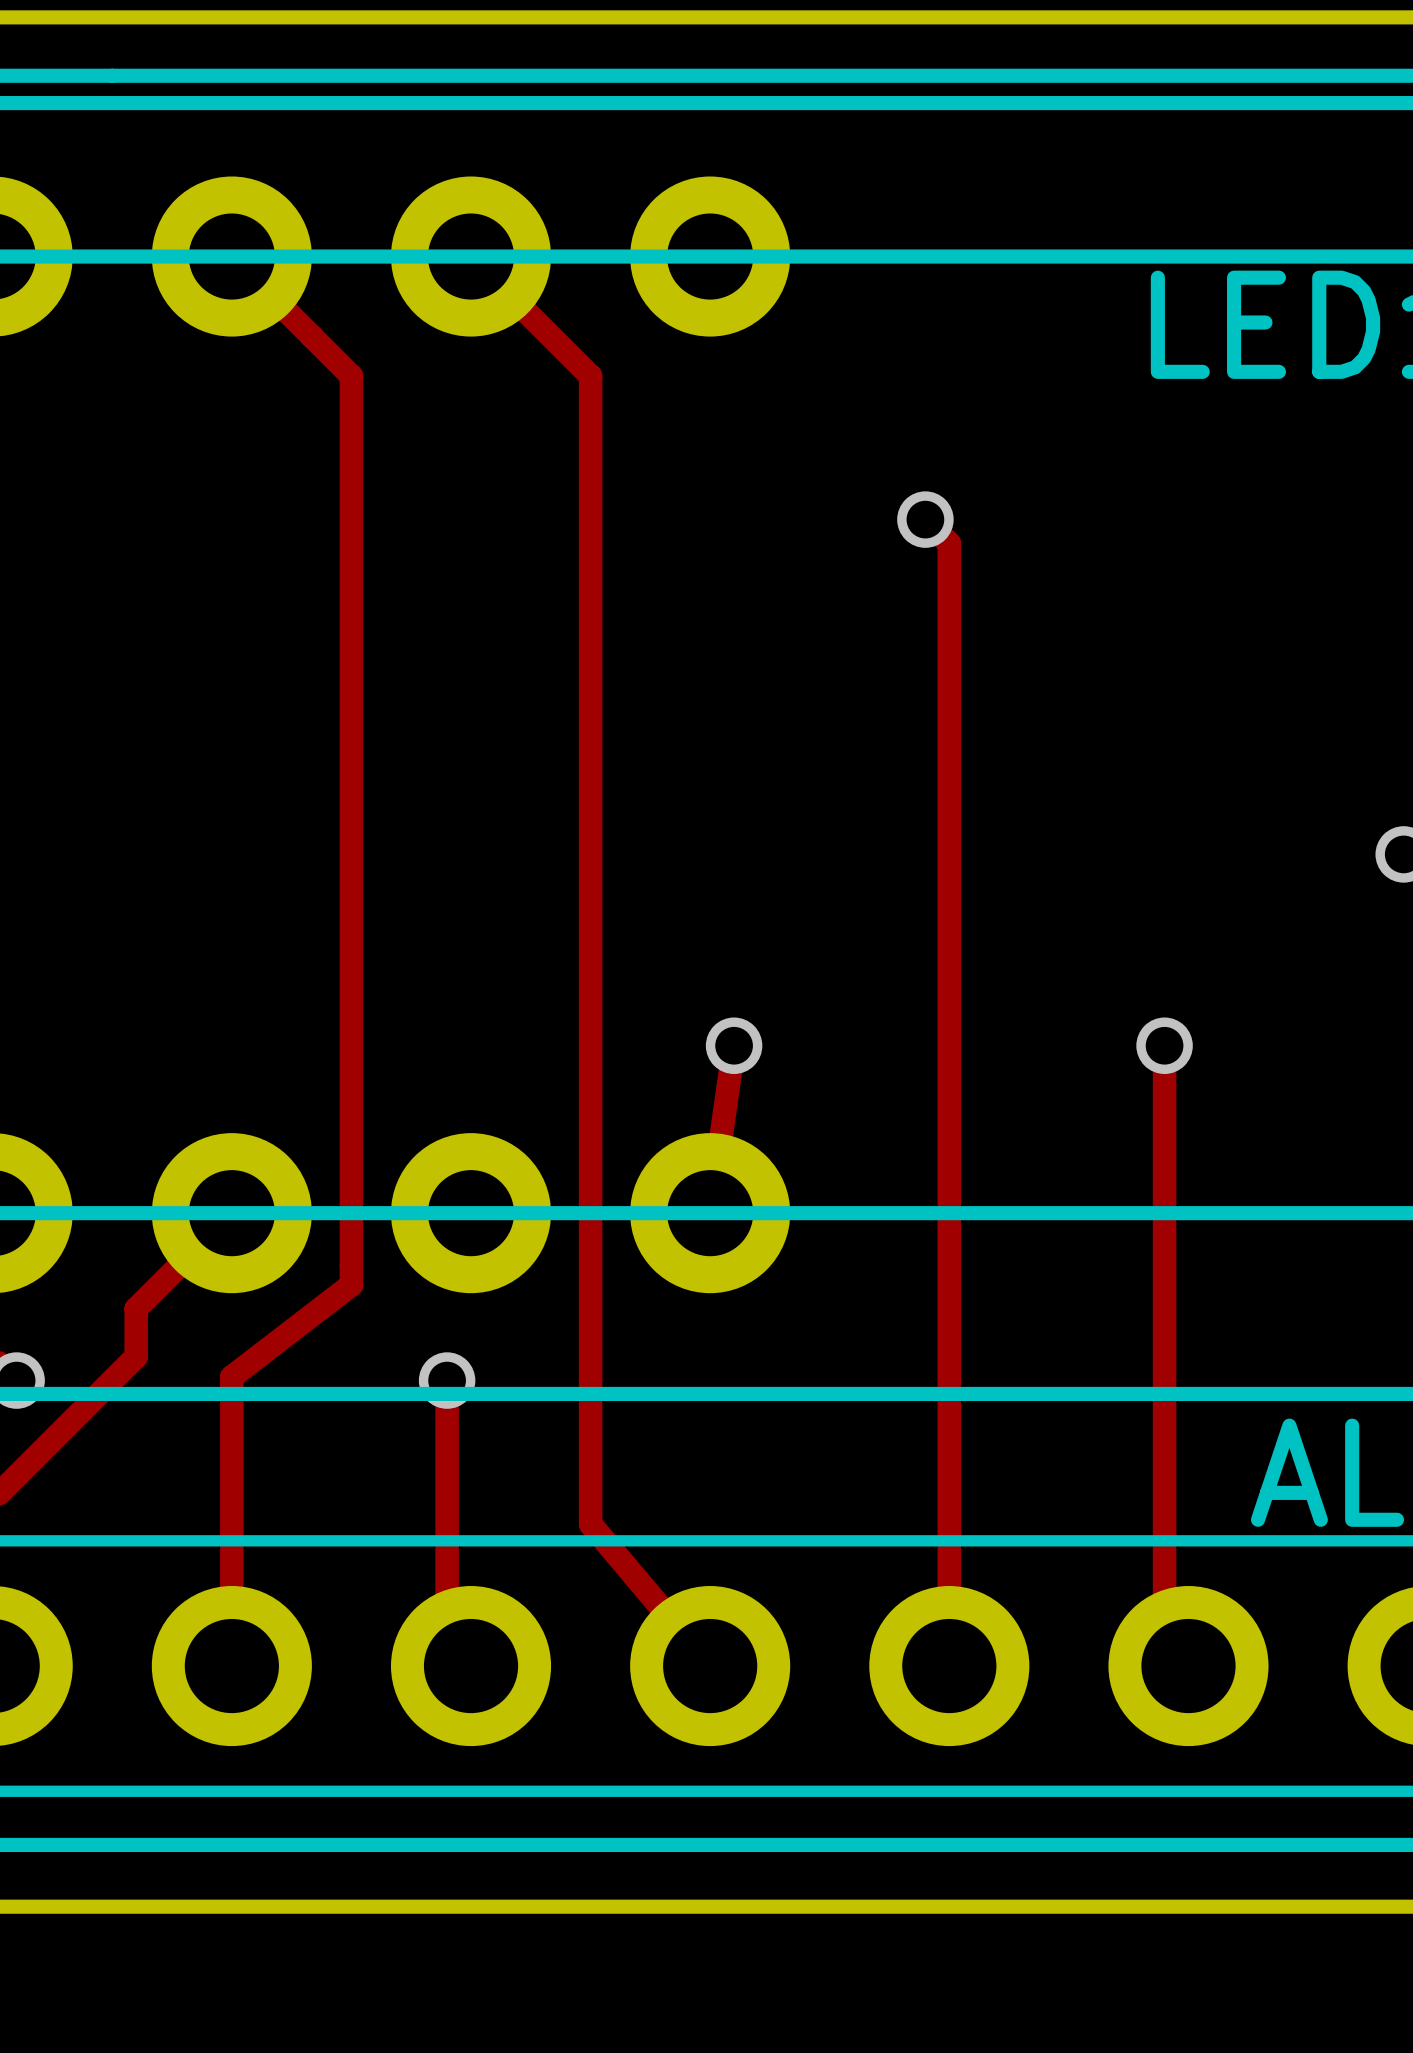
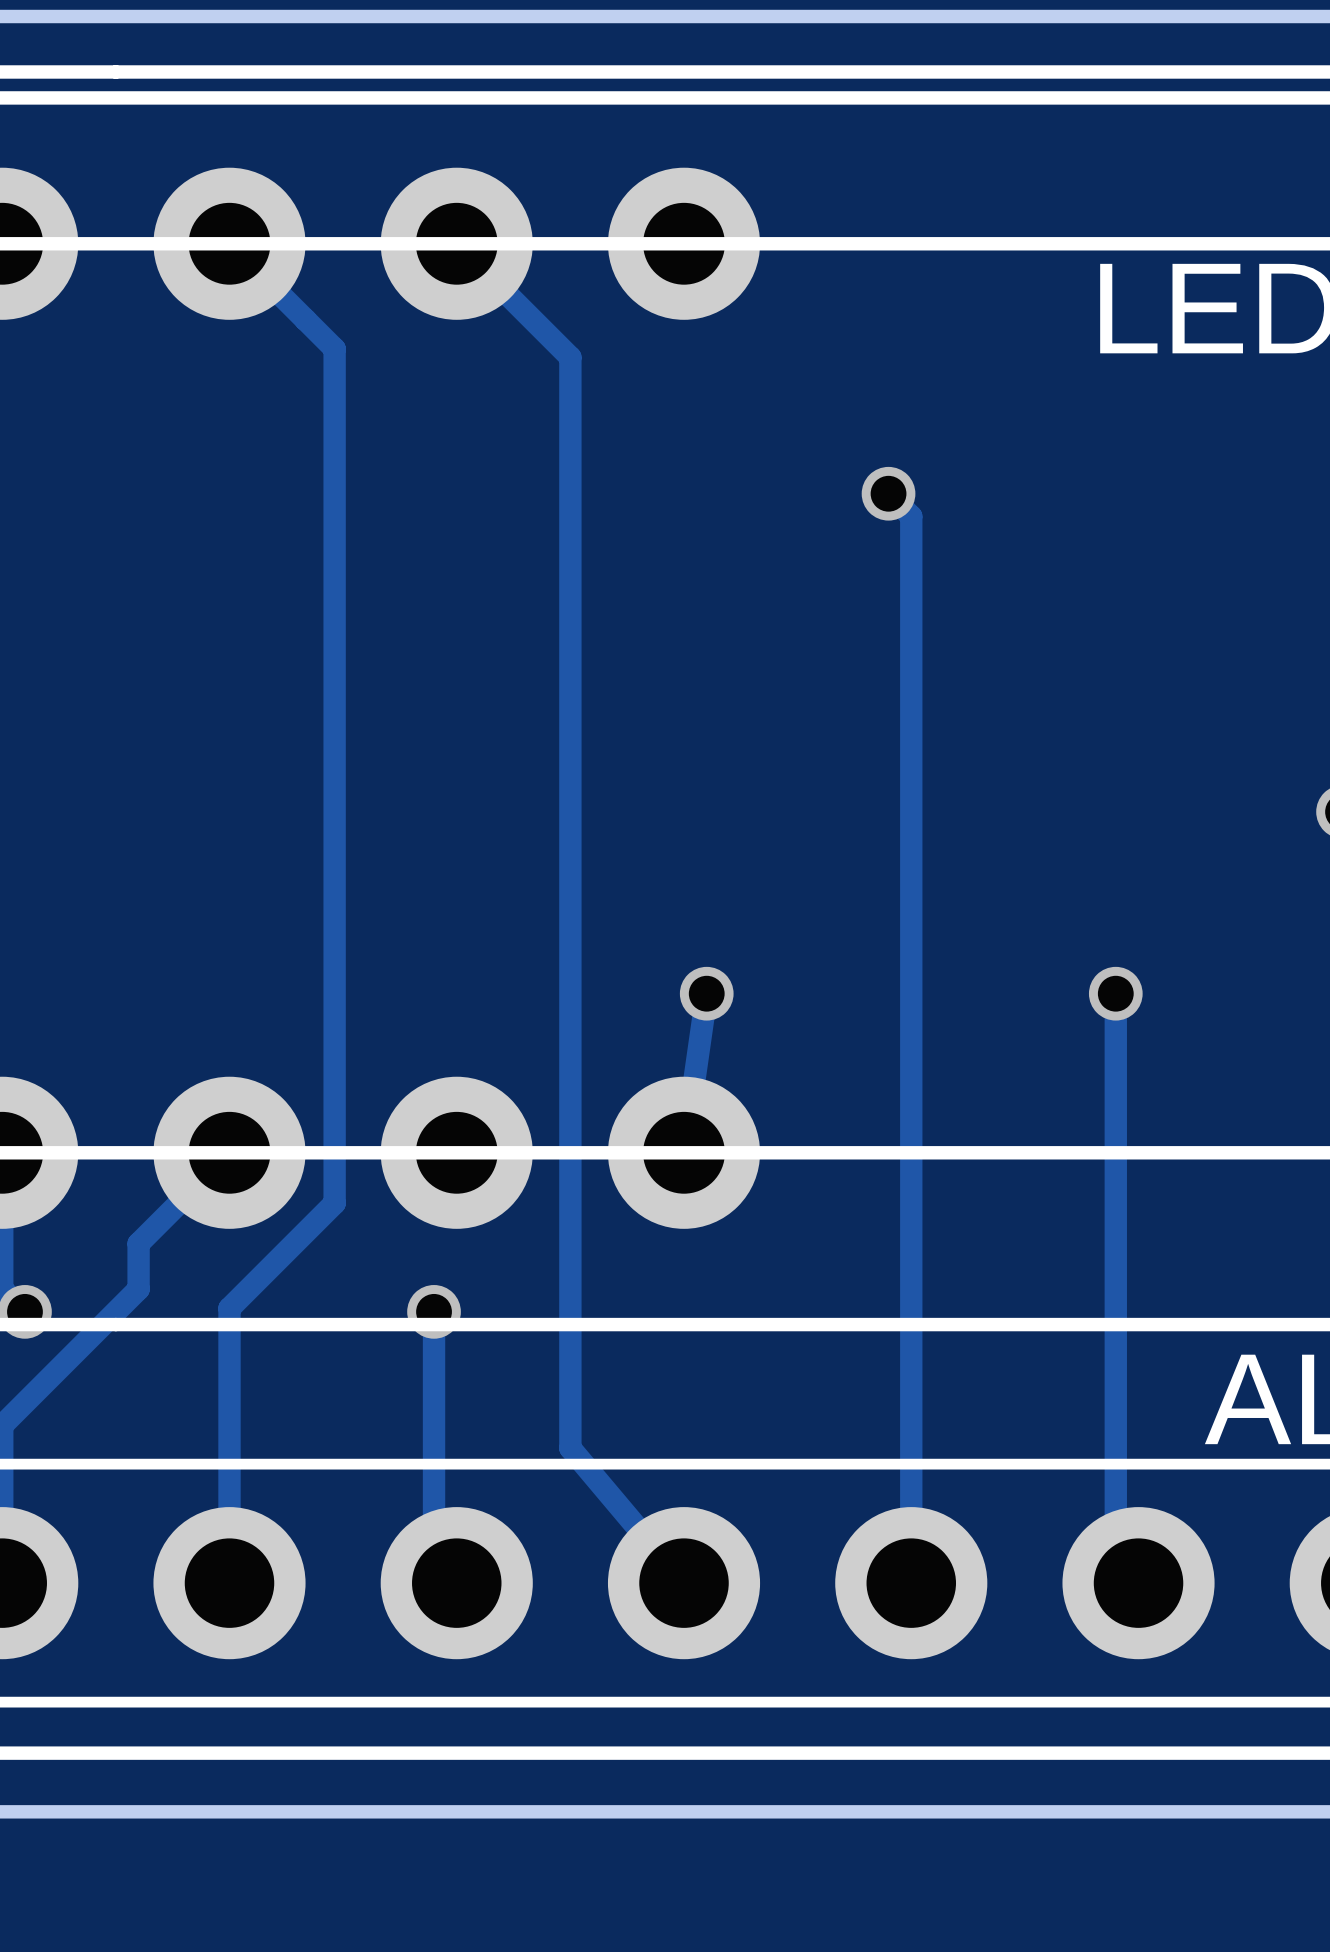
track: (342, 367) (351, 376) (351, 1284) (231, 1376) -> (334, 348) (334, 1203) (229, 1308)

